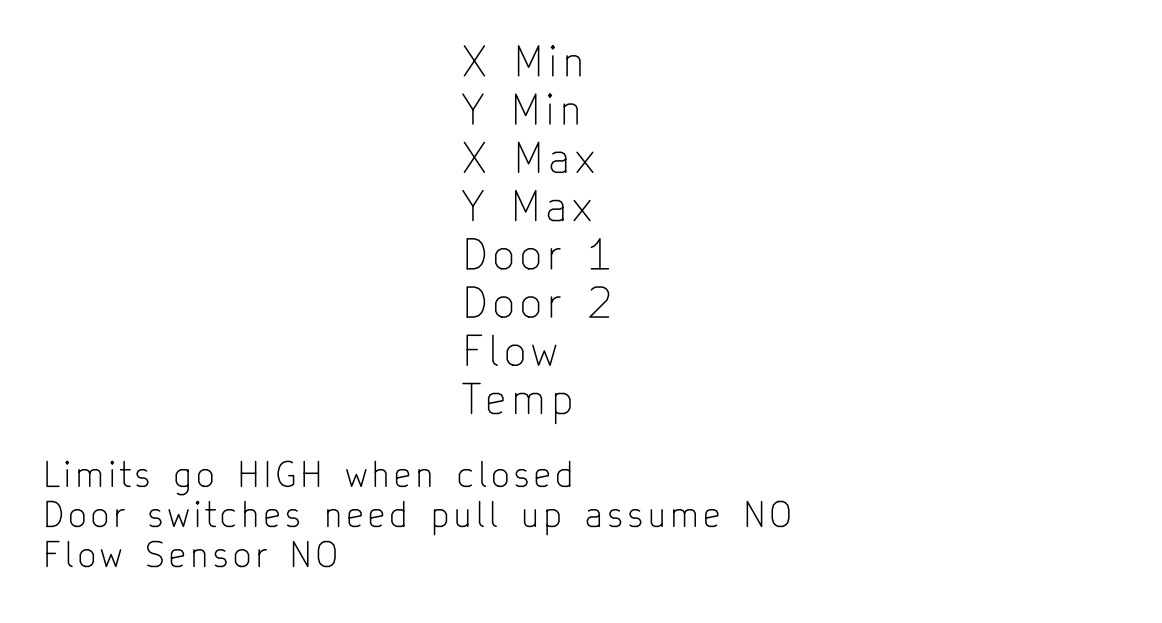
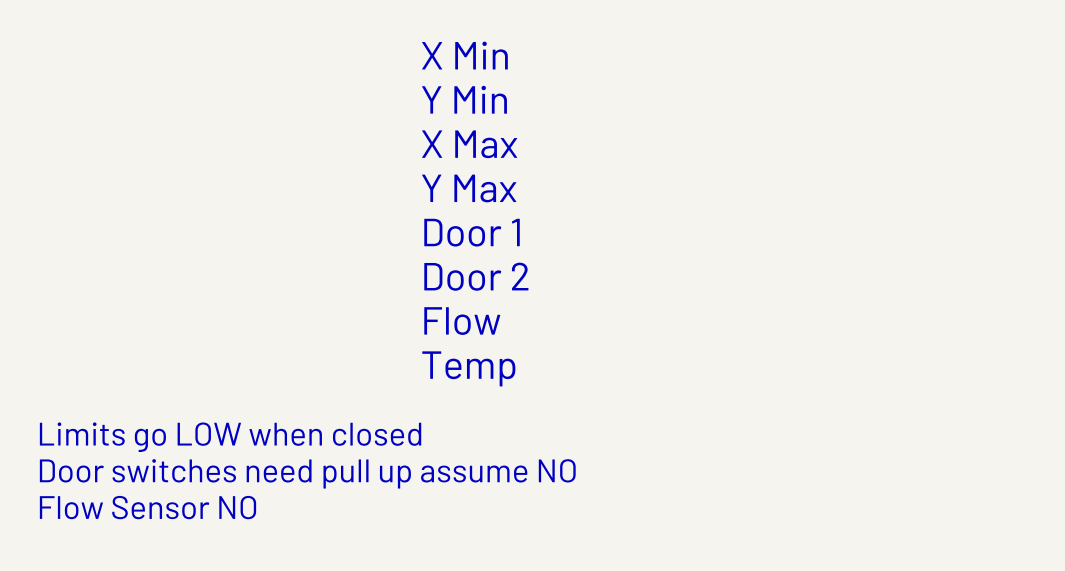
text: Limits go HIGH when closed (308, 478) -> Limits go LOW when closed (230, 437)

